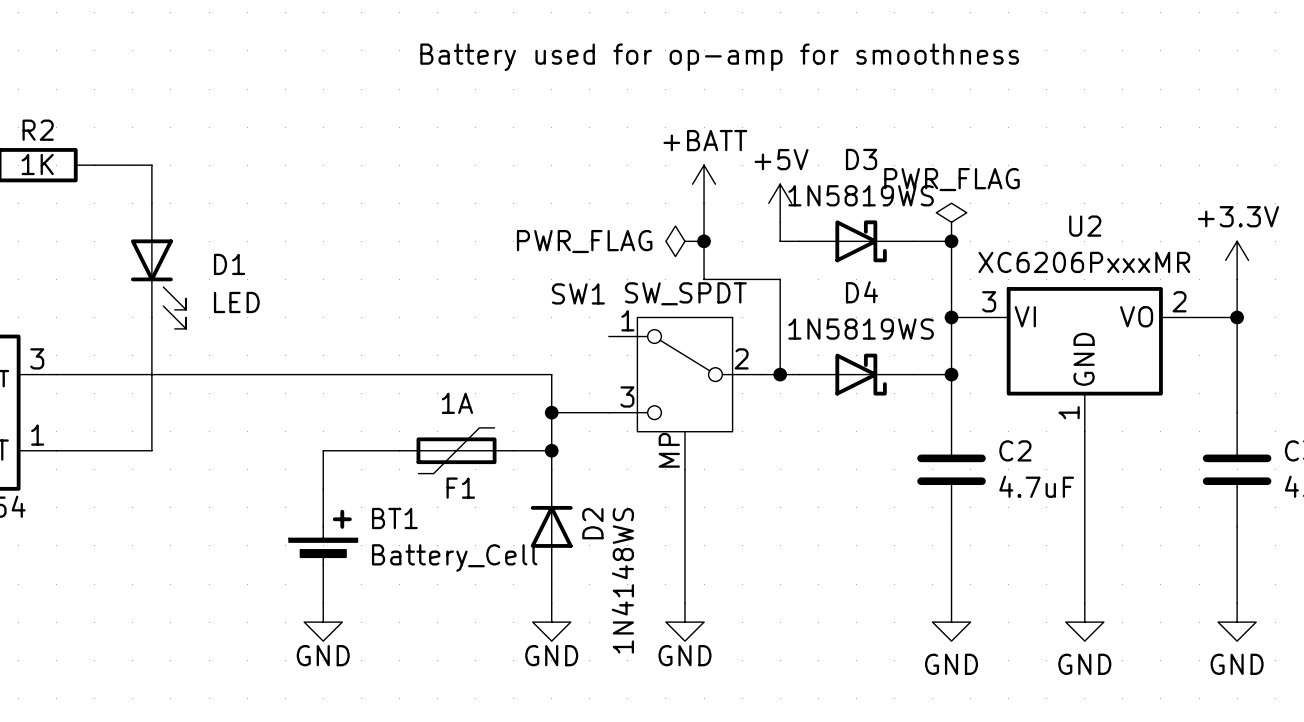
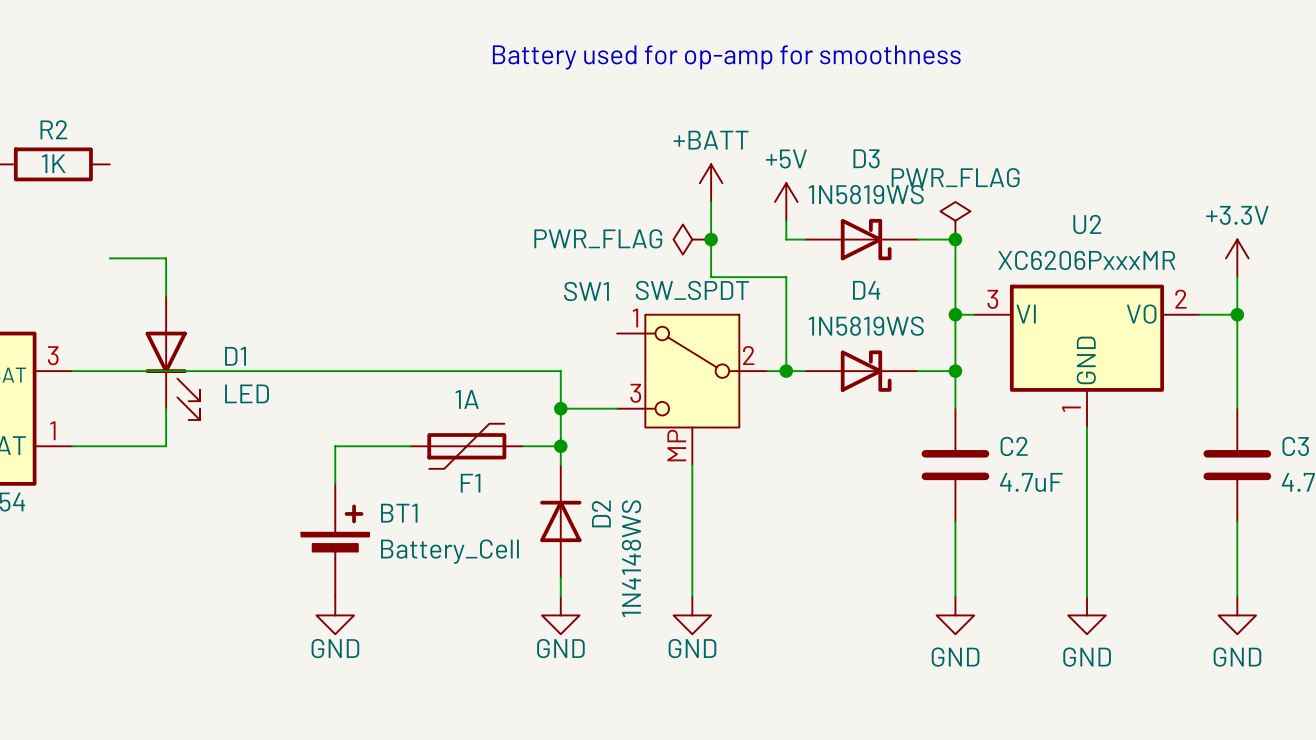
wire: (94, 165) (151, 165) (151, 203) -> (109, 258) (166, 258) (166, 295)
D1 position: (158, 266) -> (172, 357)

